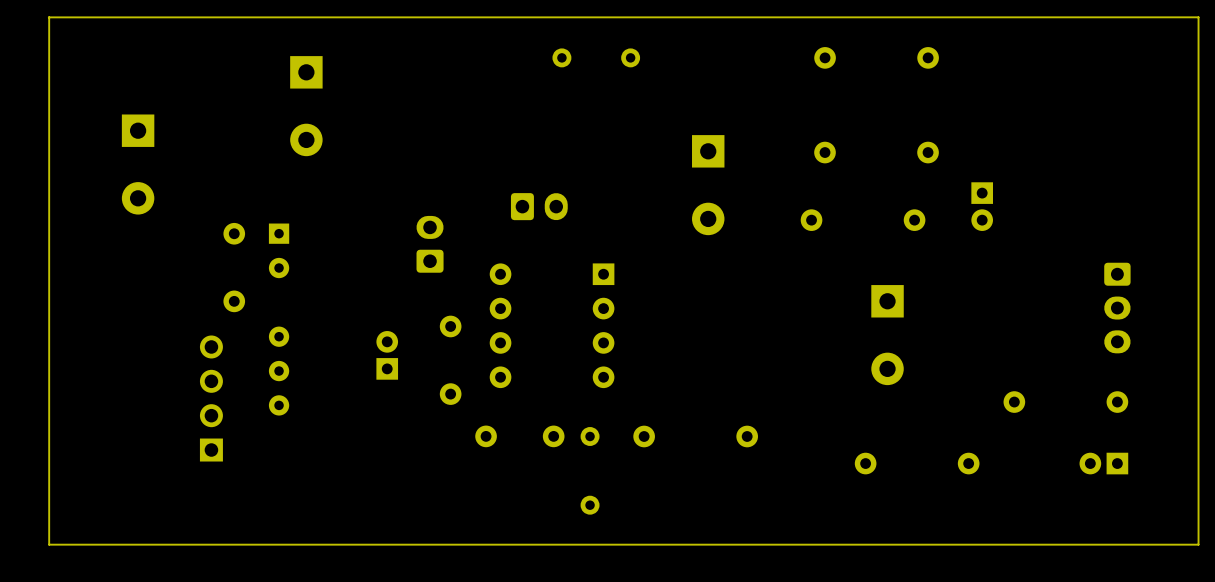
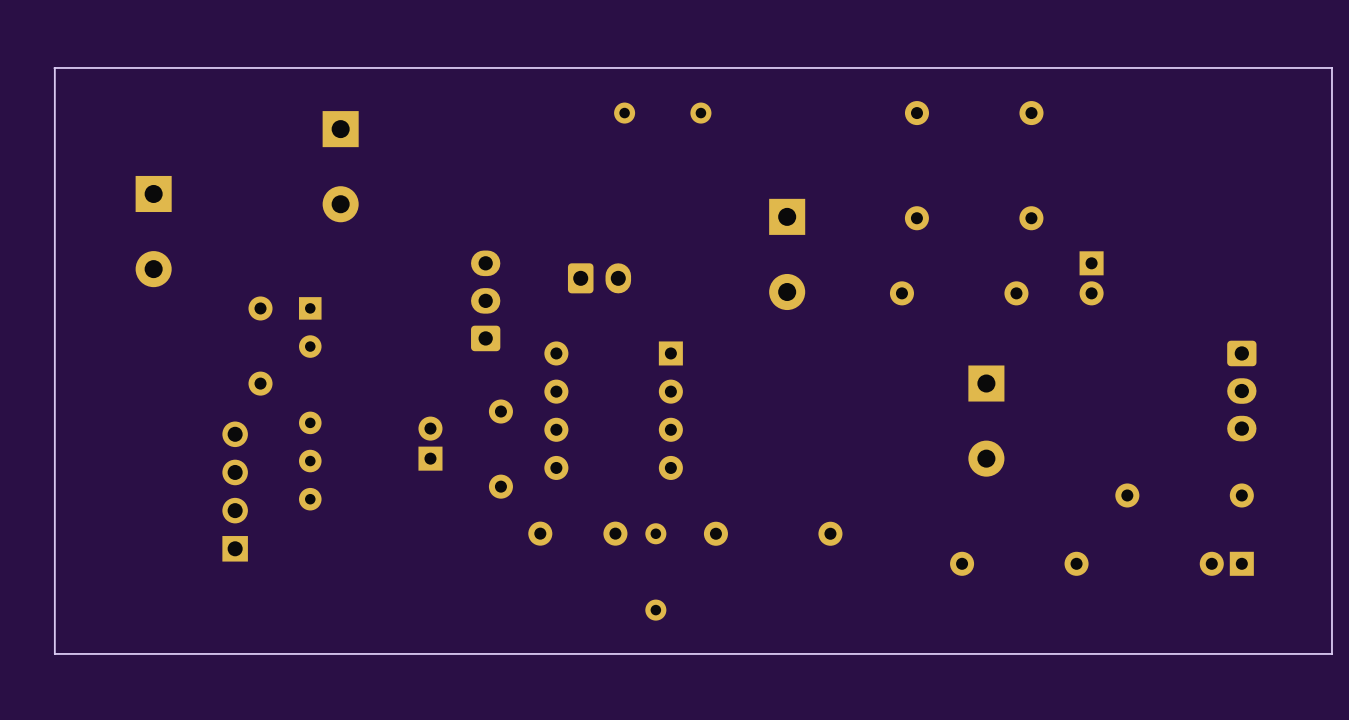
part: none -> (485, 300)
part: (430, 244) -> none

